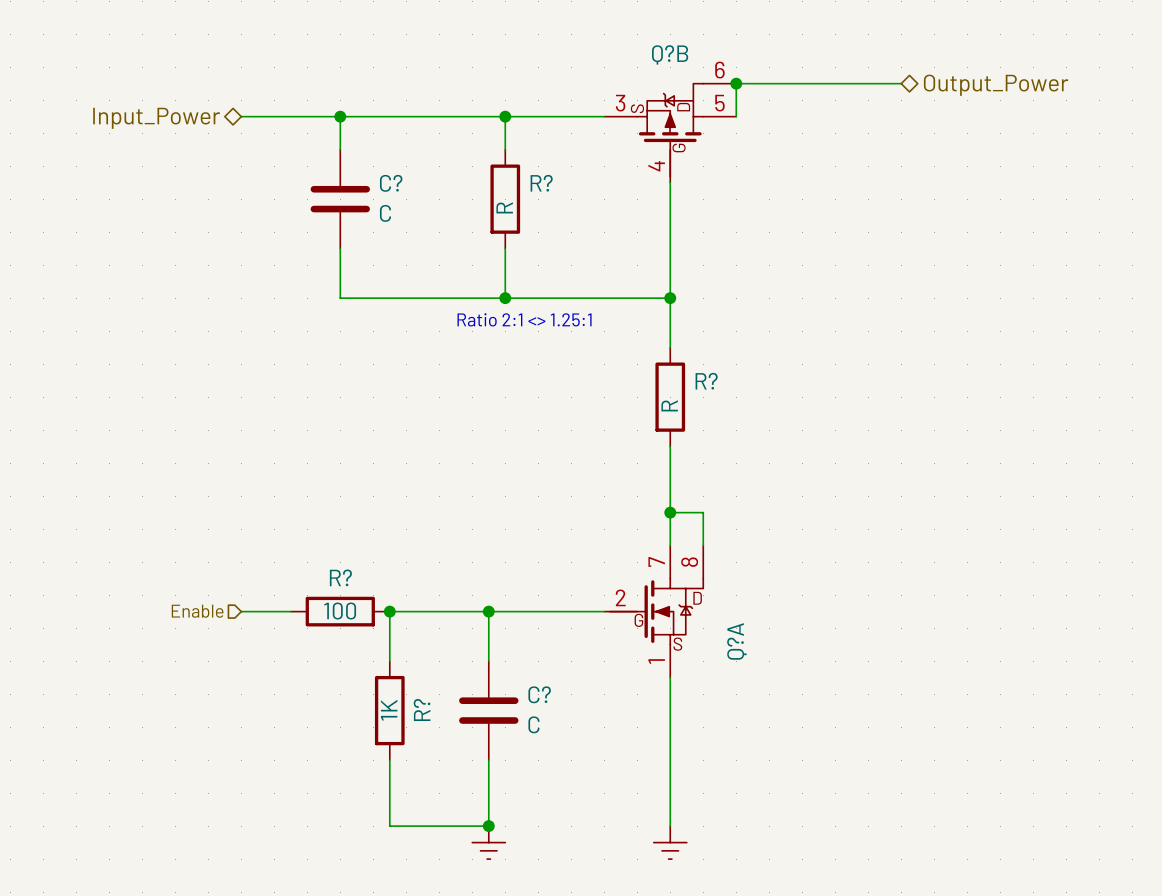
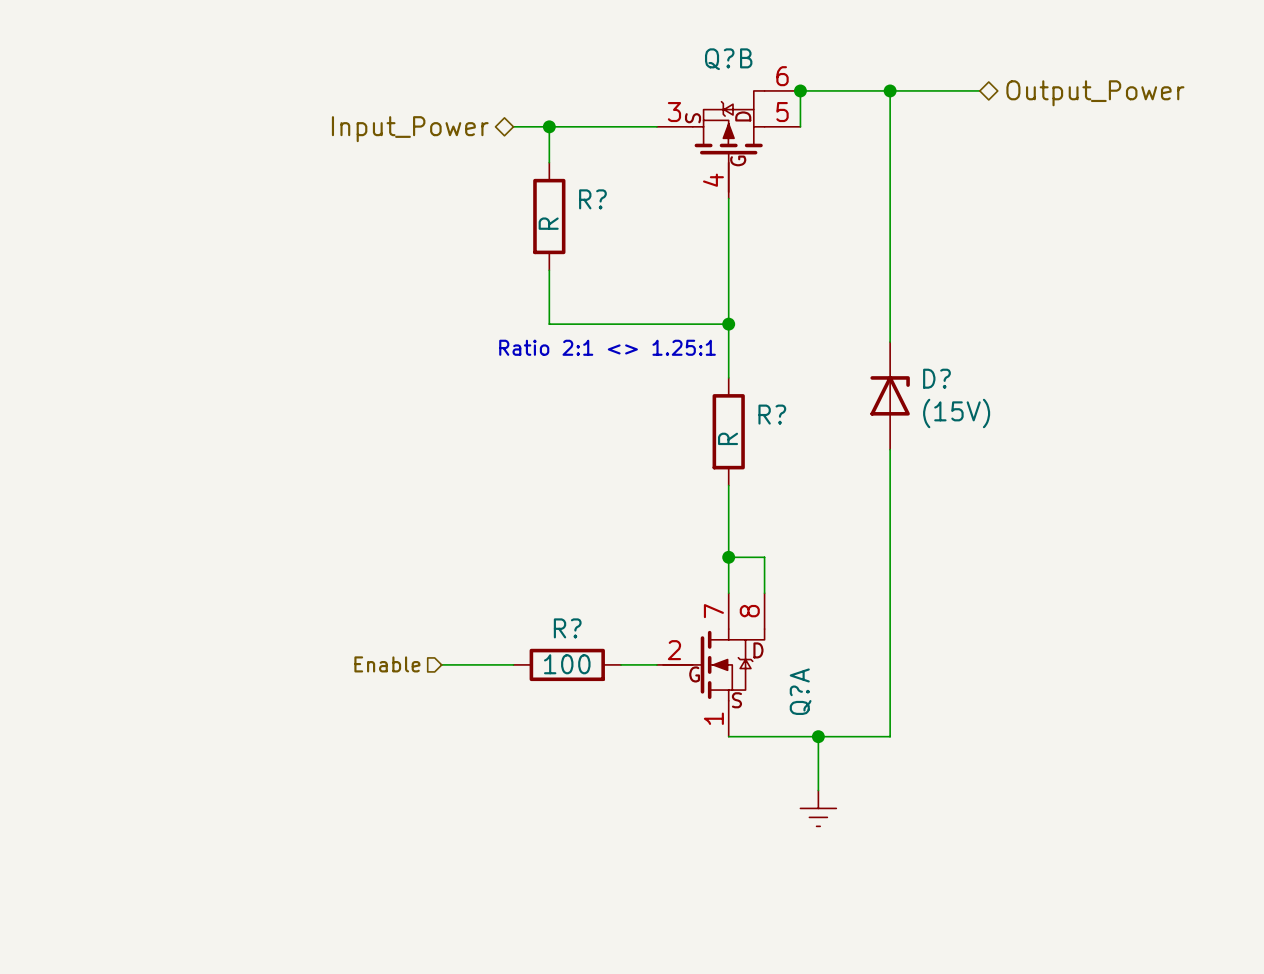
wire: none -> (890, 90) (890, 342)
junction: none -> (890, 90)
wire: (241, 116) (472, 116) -> none
wire: (340, 116) (340, 149) -> none
junction: (340, 116) -> none
hierarchical label position: Input_Power (156, 118) -> Input_Power (410, 129)
C?: C (340, 199) -> none
wire: (340, 248) (340, 298) (505, 298) -> none
junction: (505, 298) -> none
D?: none -> (15V) (890, 395)
hierarchical label position: Enable (197, 611) -> Enable (387, 664)
wire: (241, 611) (290, 611) -> none
R? position: (340, 611) -> (567, 664)
junction: (389, 611) -> none
wire: (406, 611) (389, 611) (389, 661) -> none
wire: (472, 611) (571, 611) -> none
wire: (488, 611) (488, 661) -> (818, 736) (818, 790)
junction: (488, 611) -> none
wire: (670, 677) (670, 826) -> (728, 736) (890, 736) (890, 449)
junction: none -> (818, 736)
R?: 1K (389, 710) -> none
C?: C (488, 710) -> none
wire: (389, 760) (389, 826) (488, 826) (488, 760) -> none
junction: (488, 826) -> none
power symbol: (488, 842) -> none
power symbol position: (670, 842) -> (818, 808)

